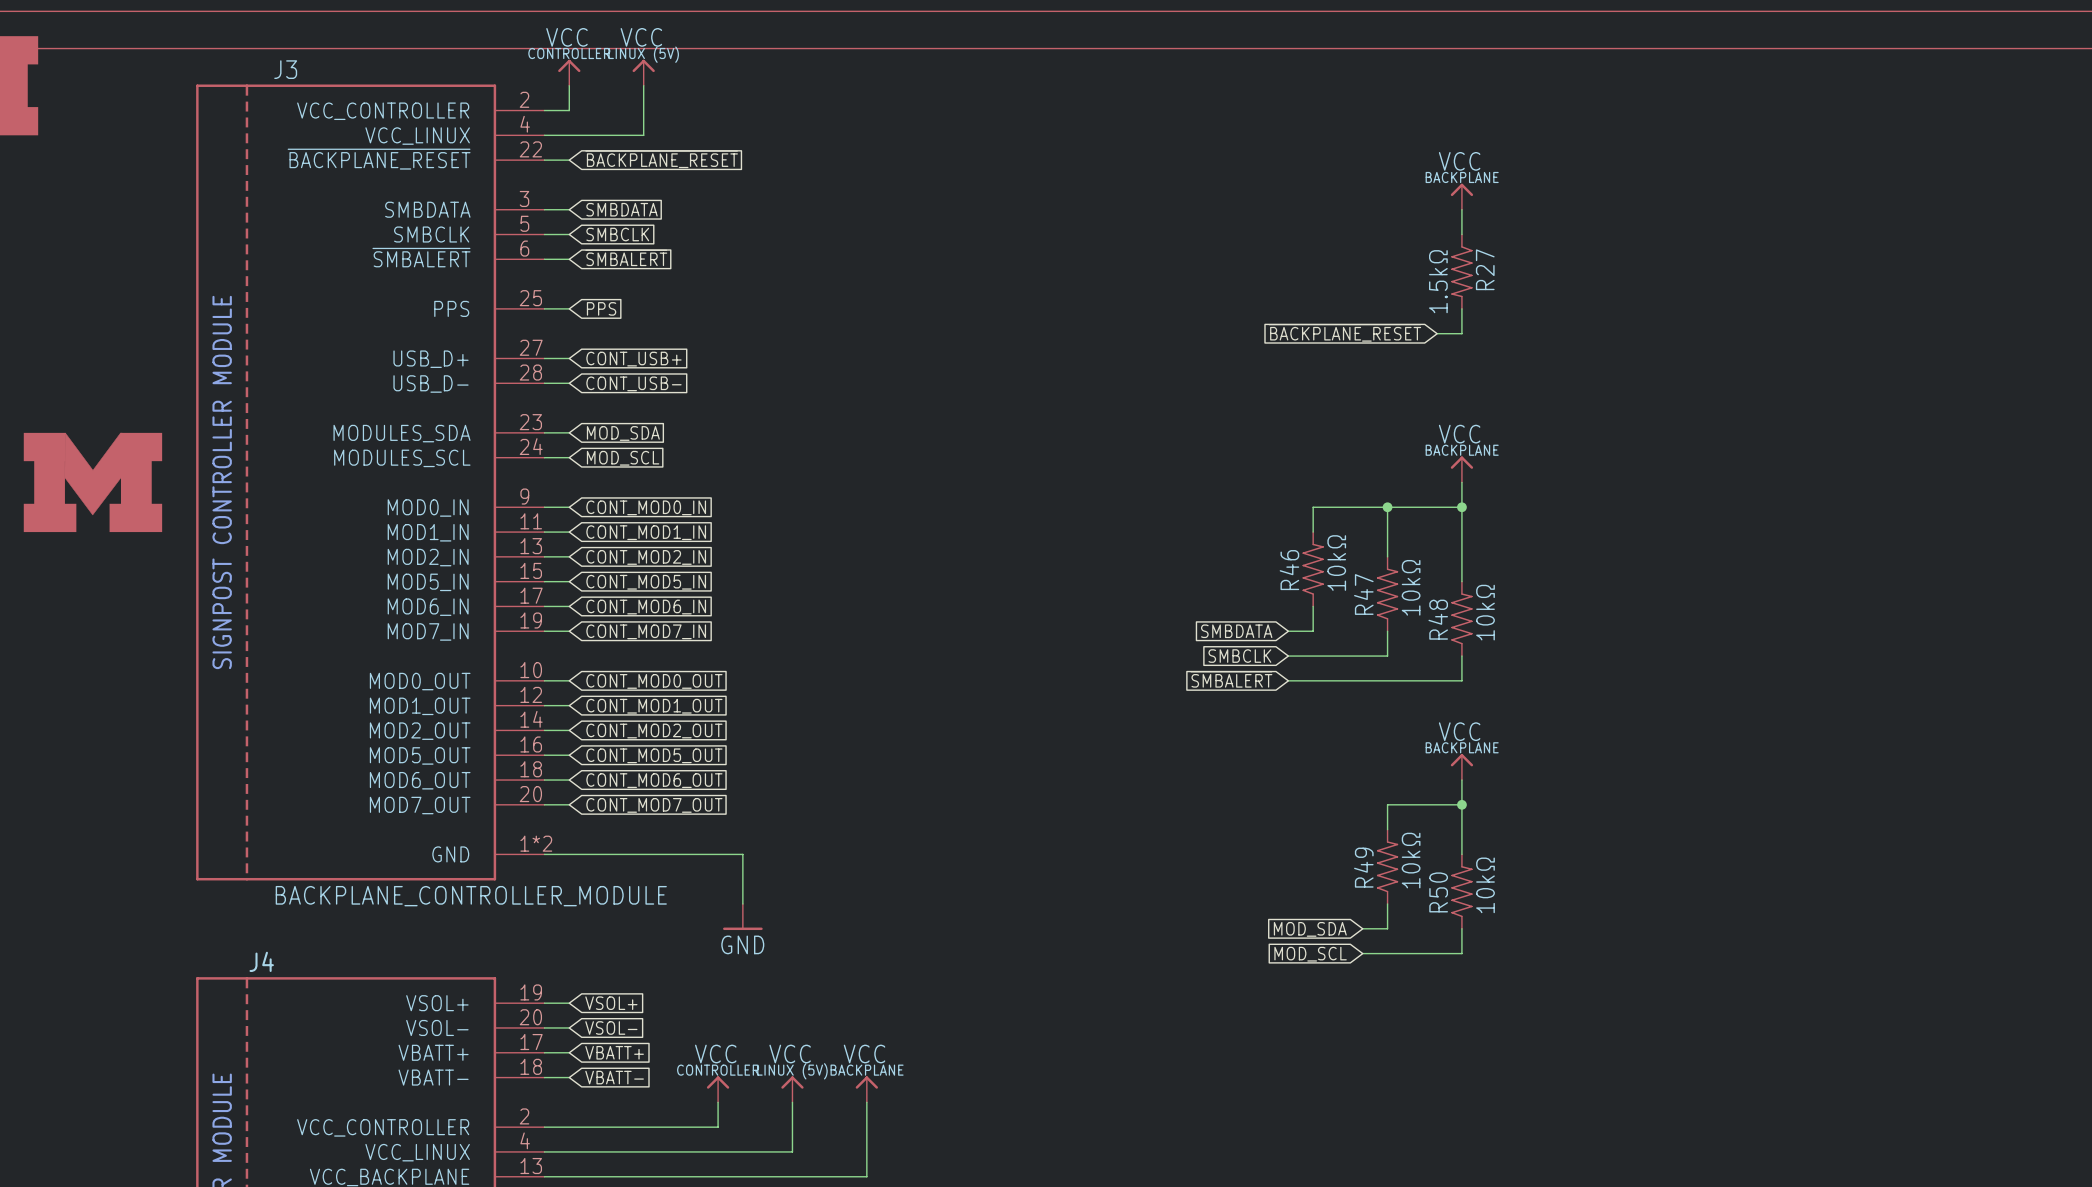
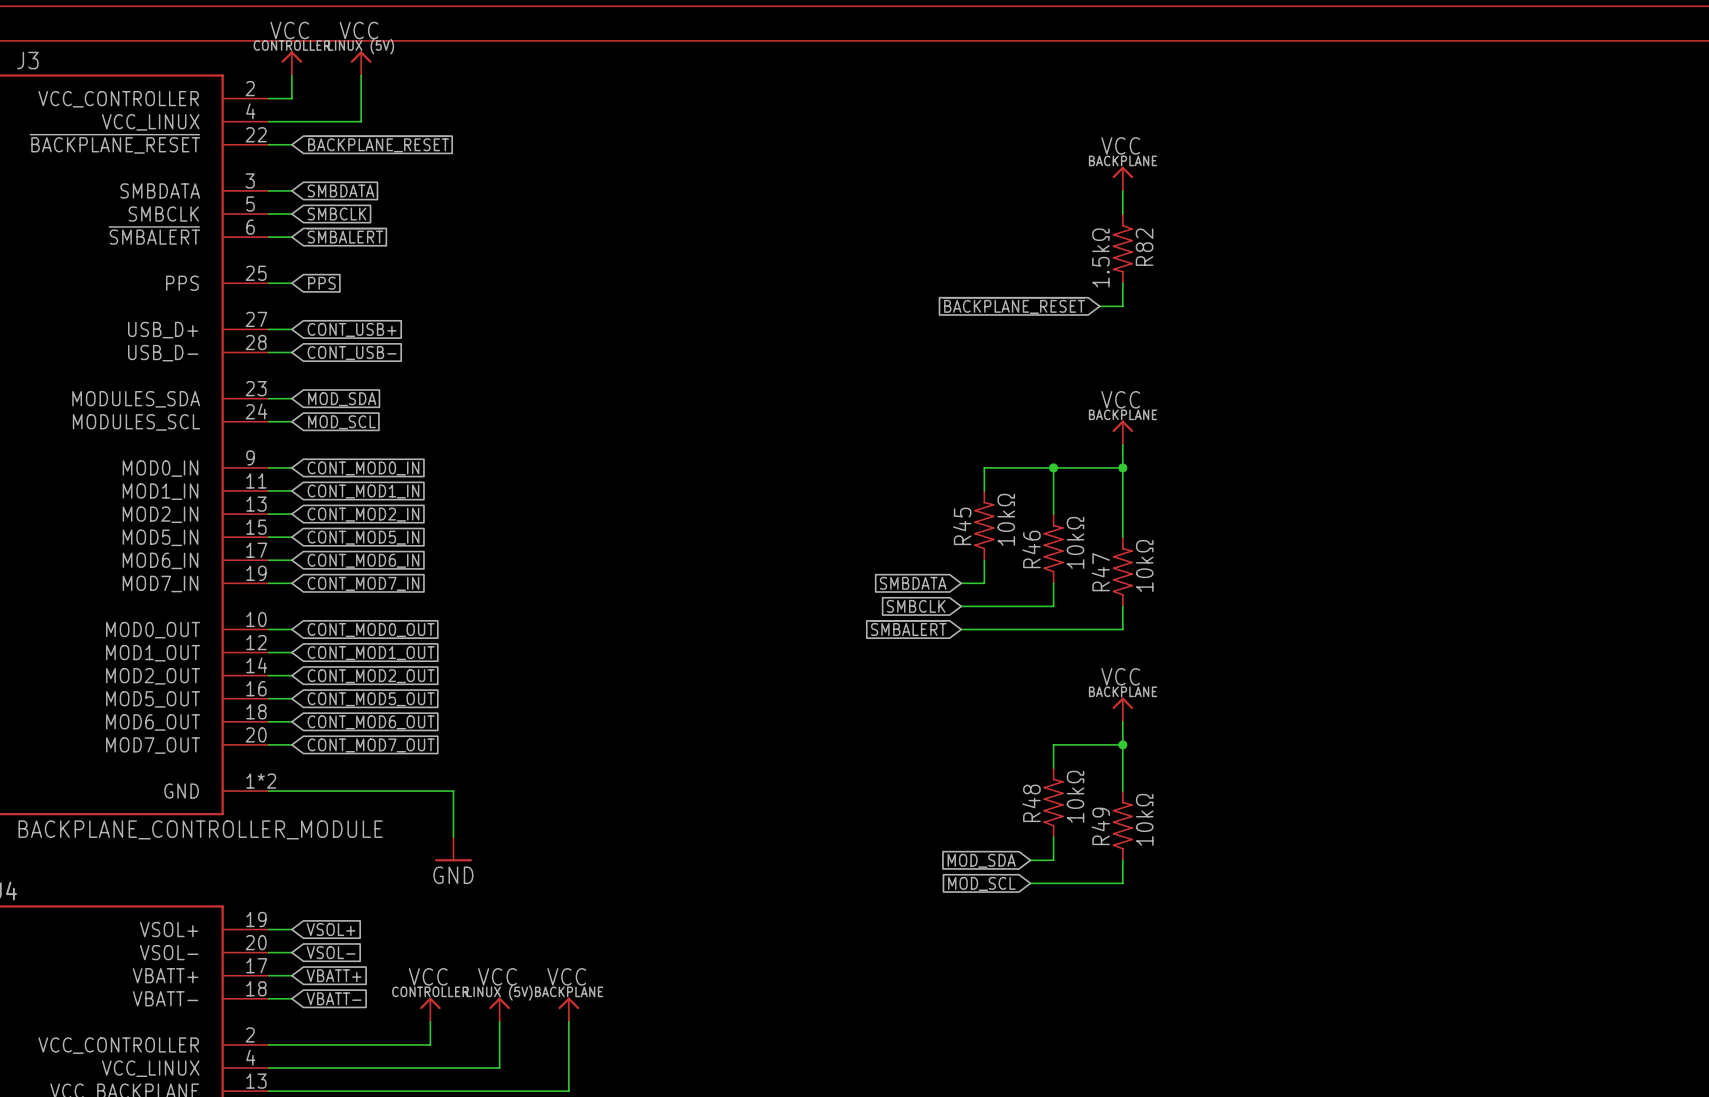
R27 name: R27 (1485, 269) -> R82 (1144, 247)
R46 name: R46 (1289, 570) -> R45 (962, 526)
R47 name: R47 (1363, 594) -> R46 (1031, 549)
R48 name: R48 (1438, 619) -> R47 (1100, 572)
R49 name: R49 (1363, 867) -> R48 (1031, 803)
R50 name: R50 (1438, 892) -> R49 (1100, 826)

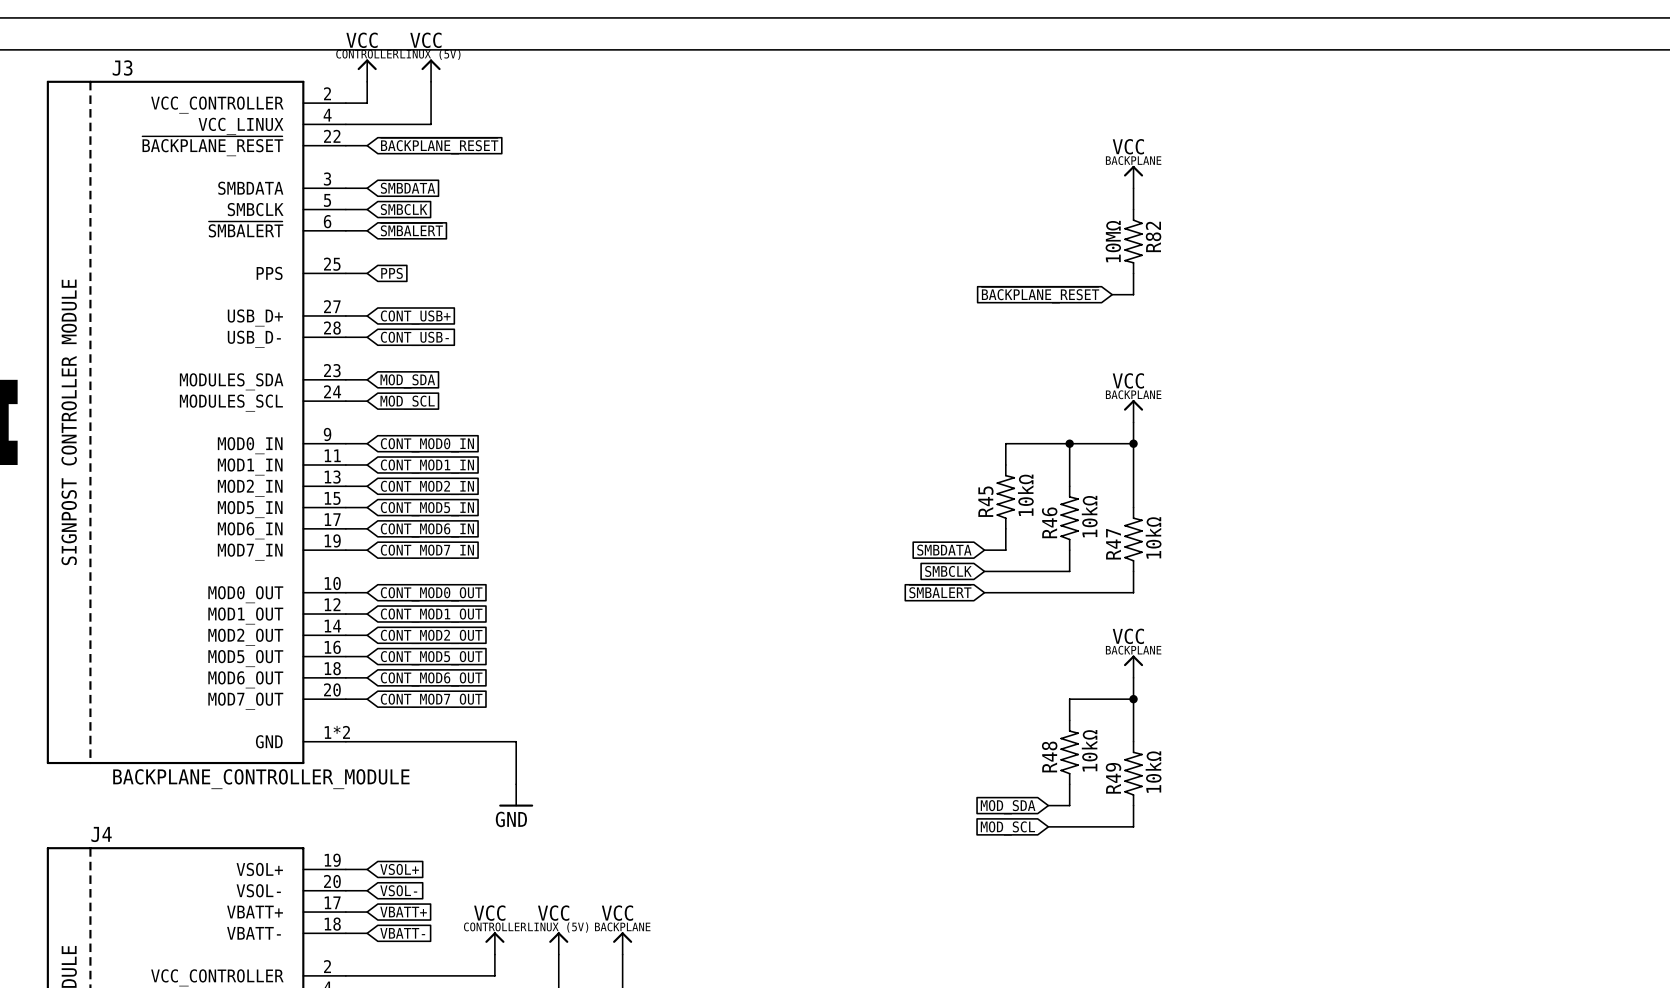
R82 value: 1.5kΩ (1100, 257) -> 10MΩ (1113, 241)

